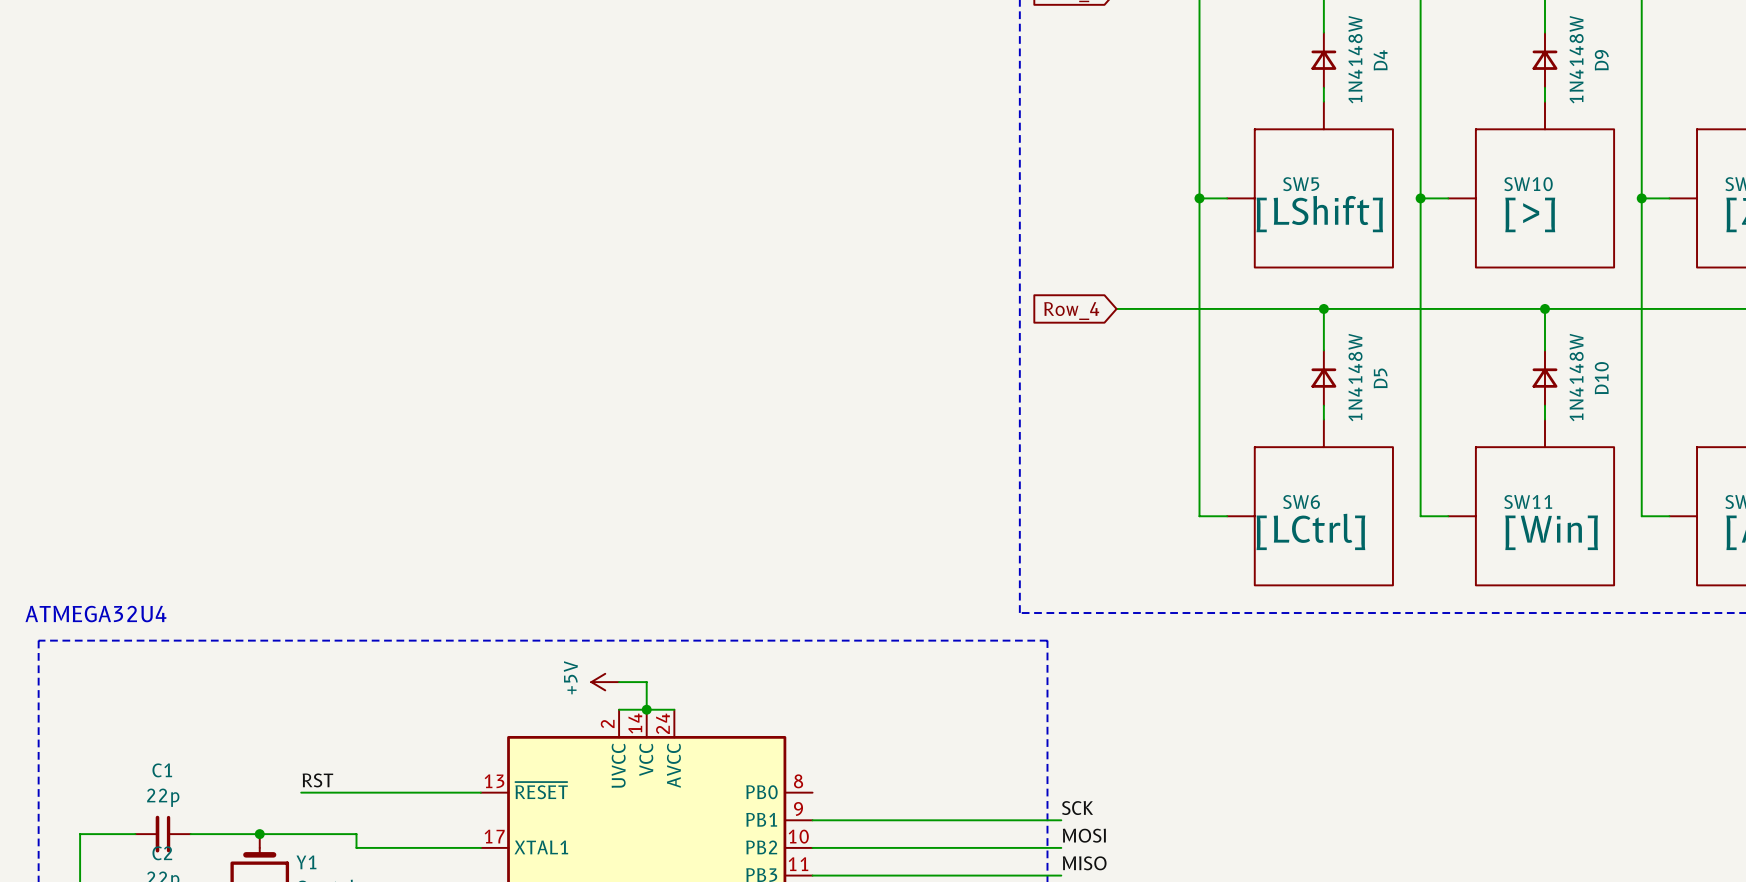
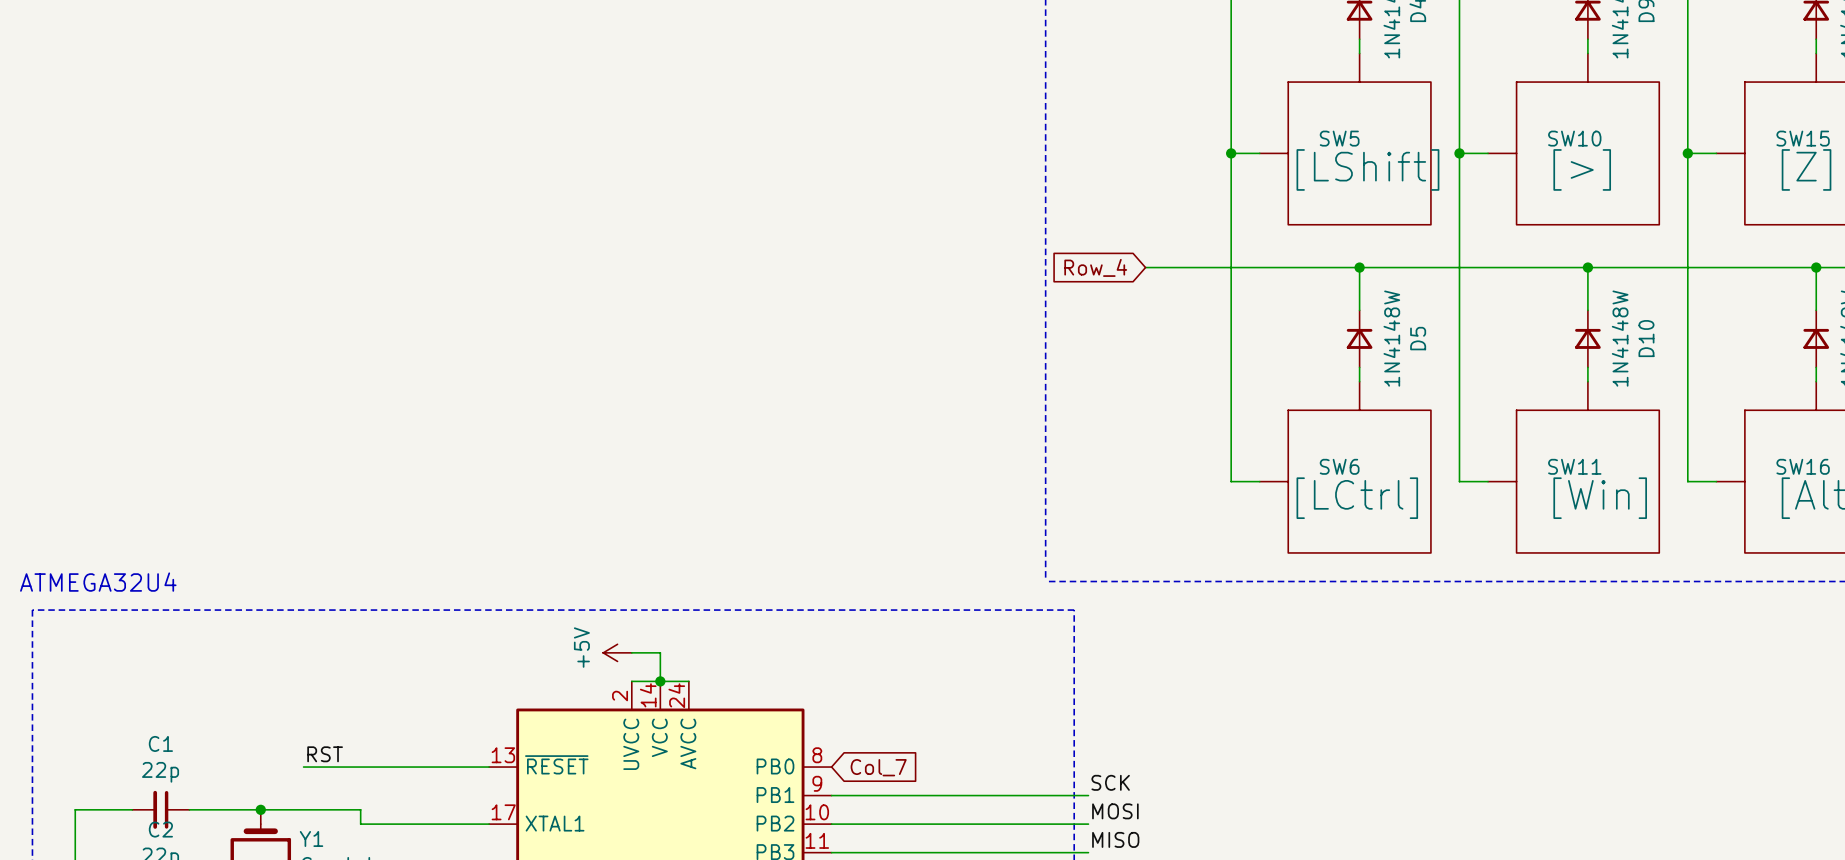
global label: none -> Col_7 (878, 767)

